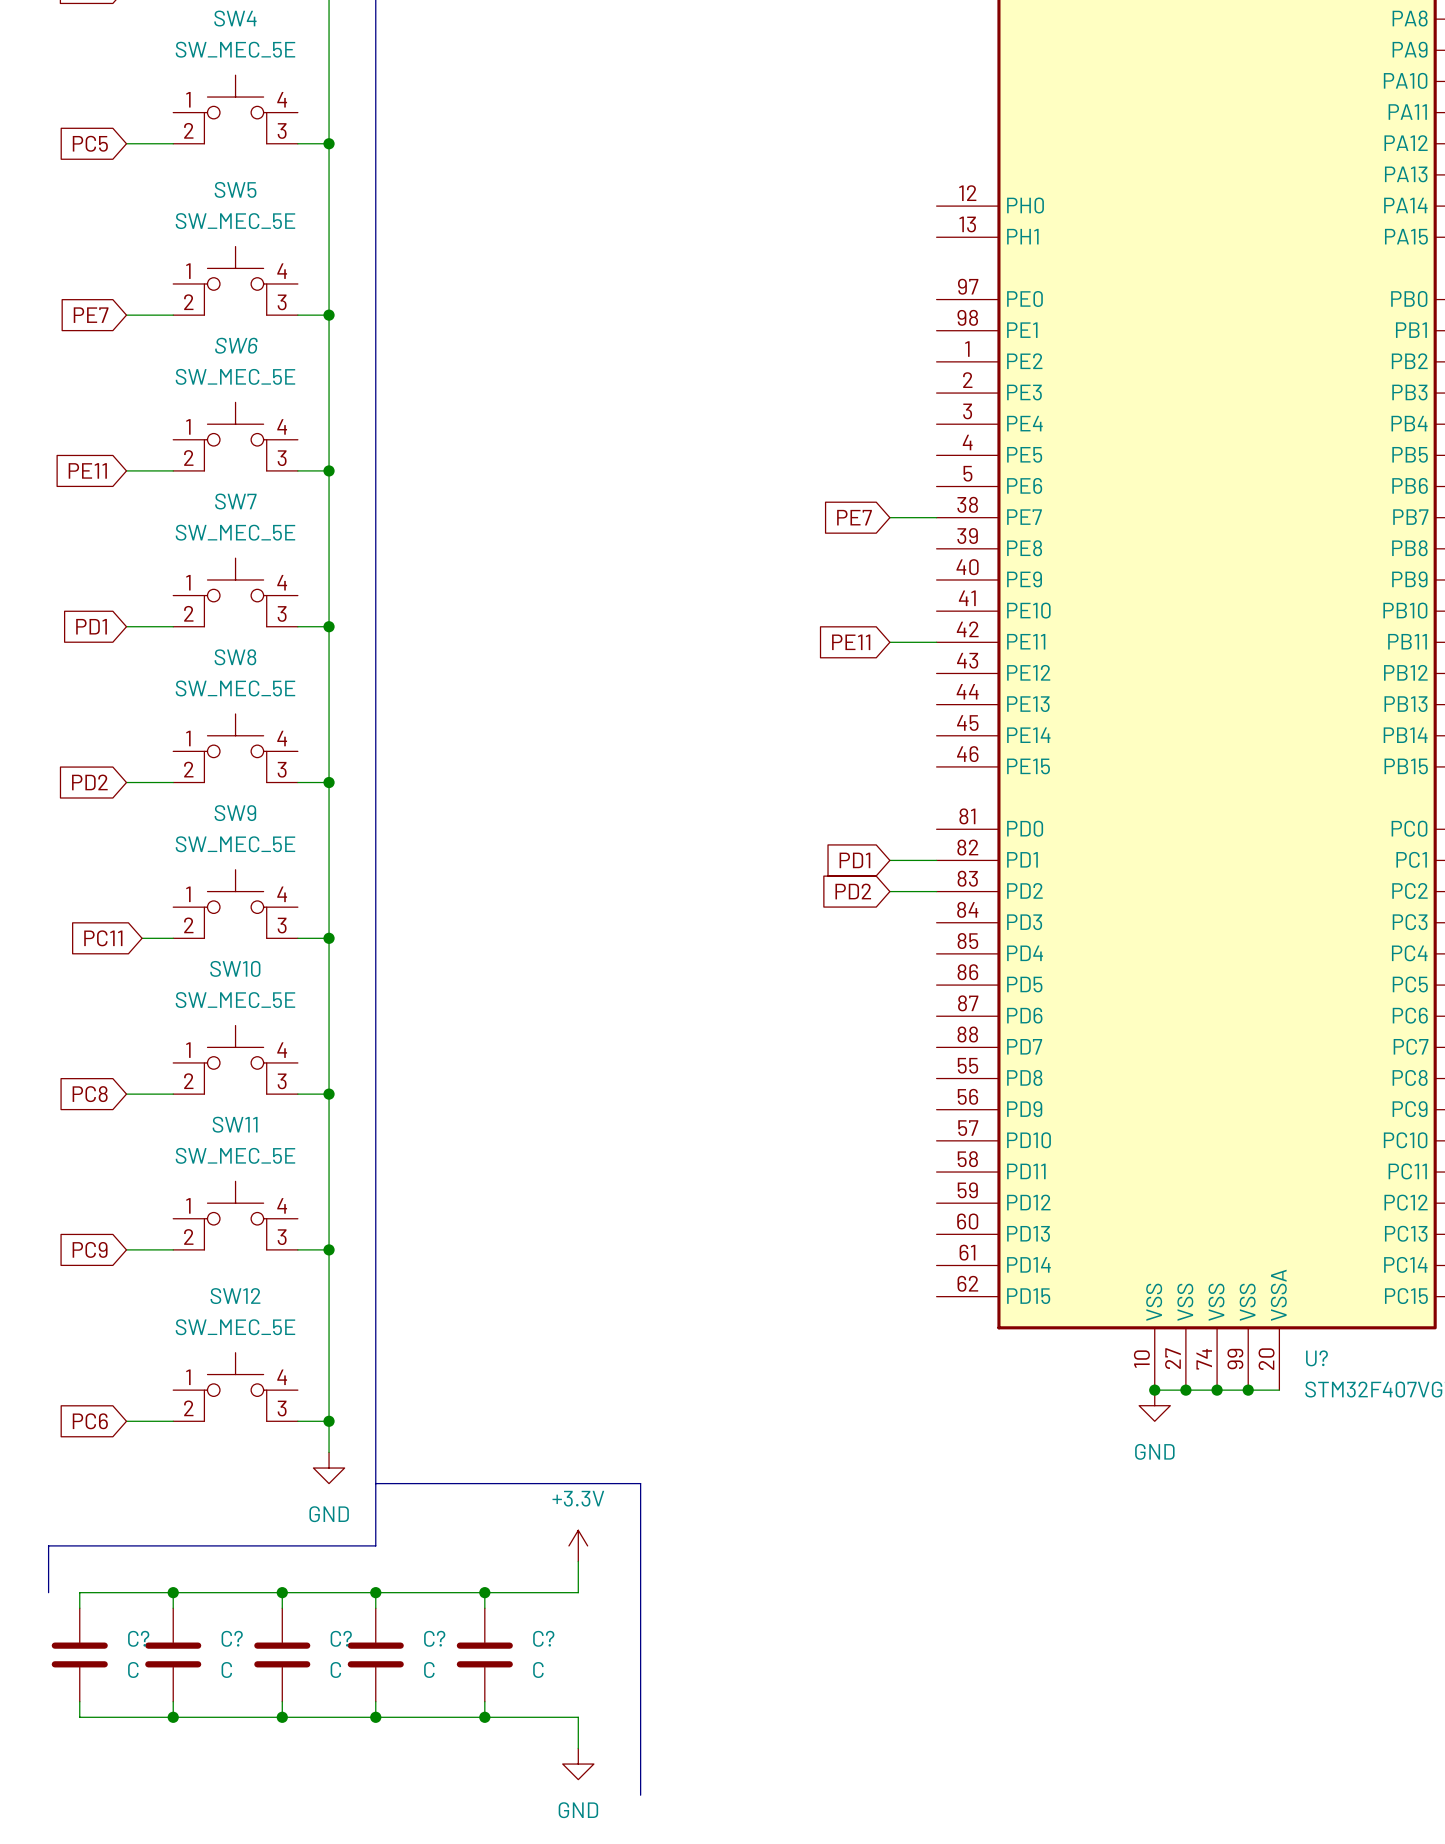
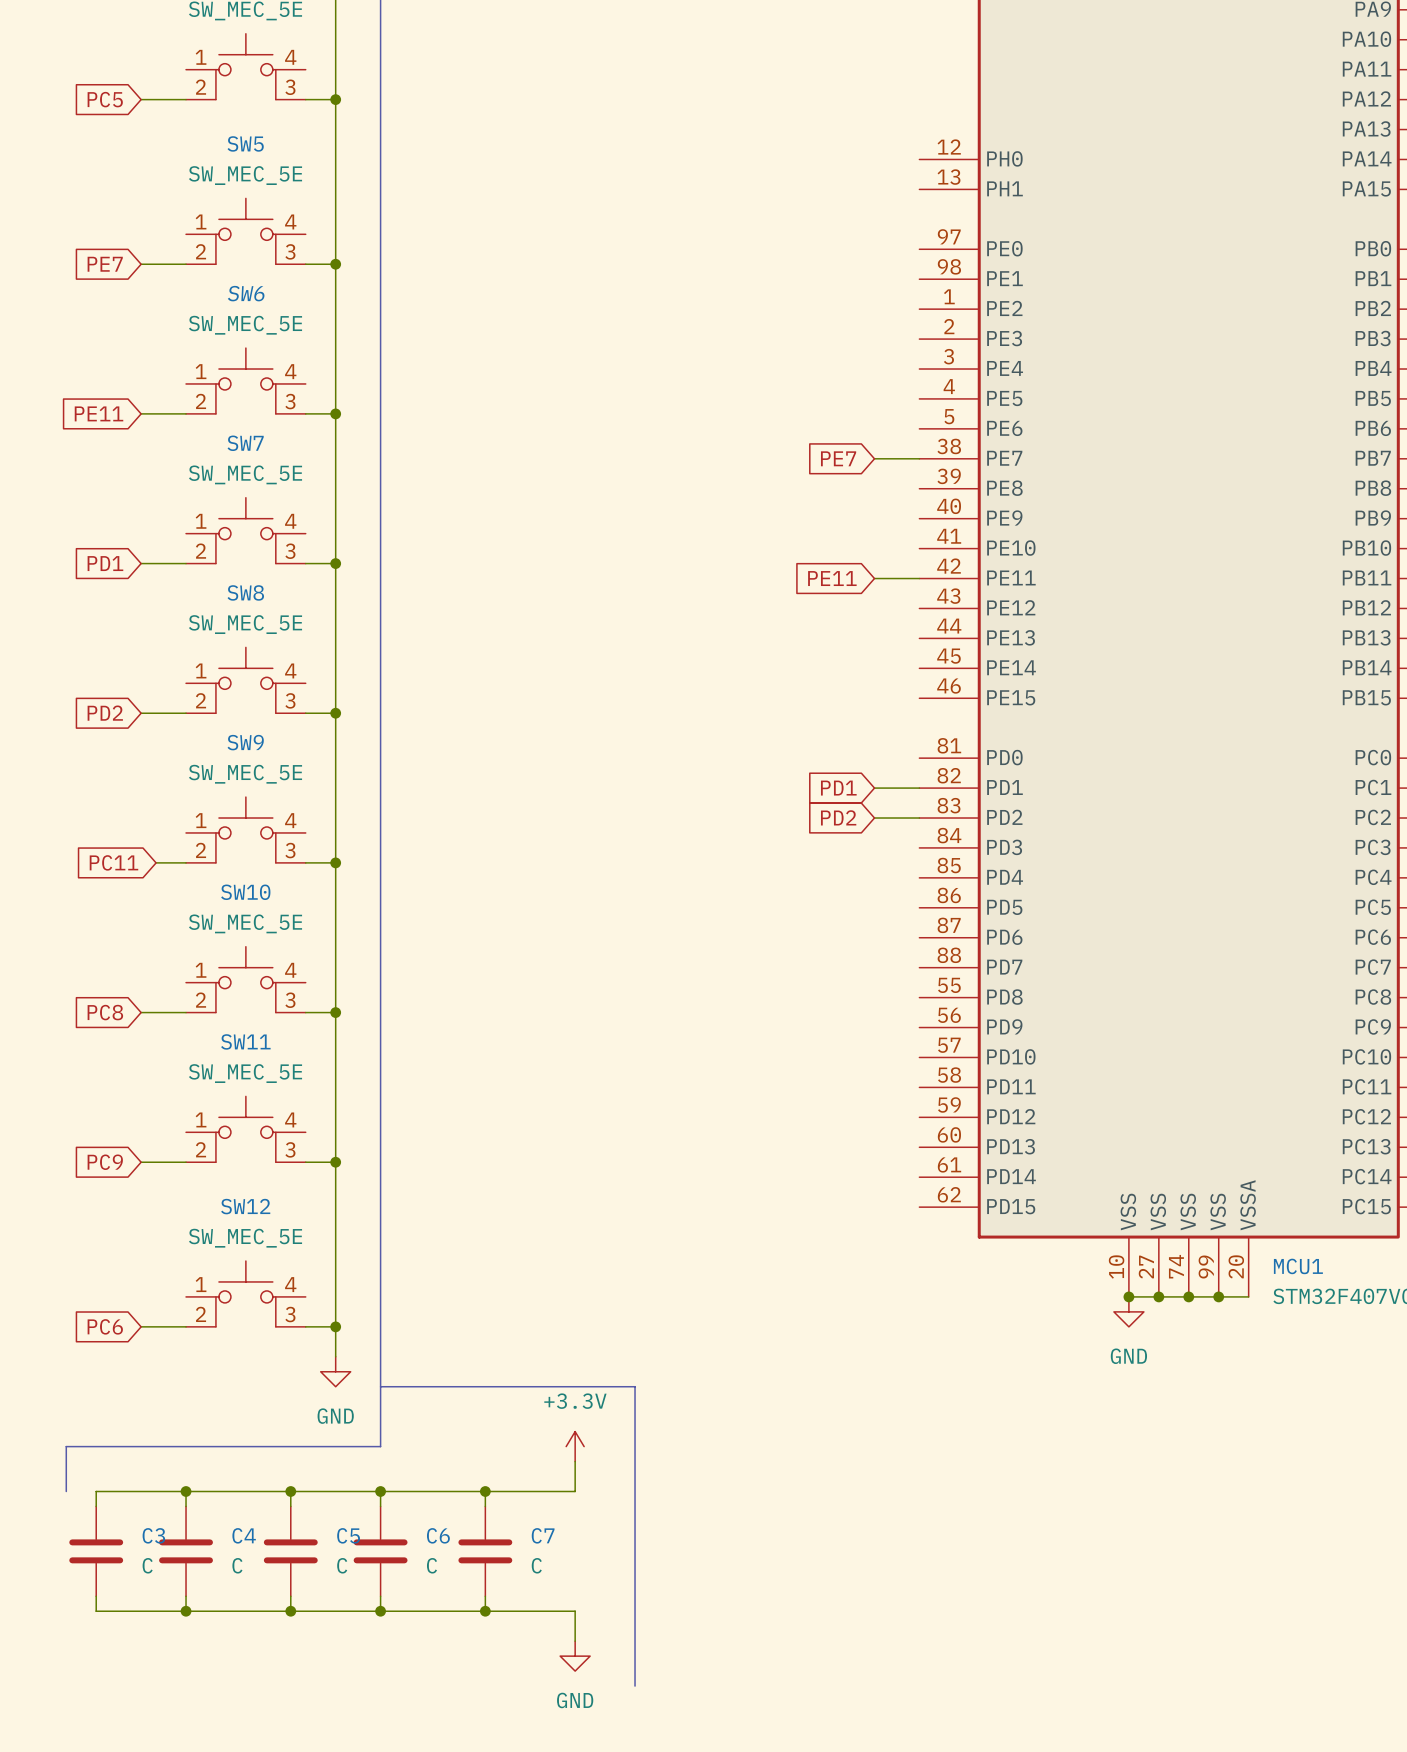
U? name: U? (1316, 1358) -> MCU1 (1298, 1266)
C? name: C? (138, 1638) -> C3 (153, 1535)
C? name: C? (232, 1638) -> C4 (244, 1535)
C? name: C? (341, 1638) -> C5 (348, 1535)
C? name: C? (434, 1638) -> C6 (438, 1535)
C? name: C? (543, 1638) -> C7 (543, 1535)

